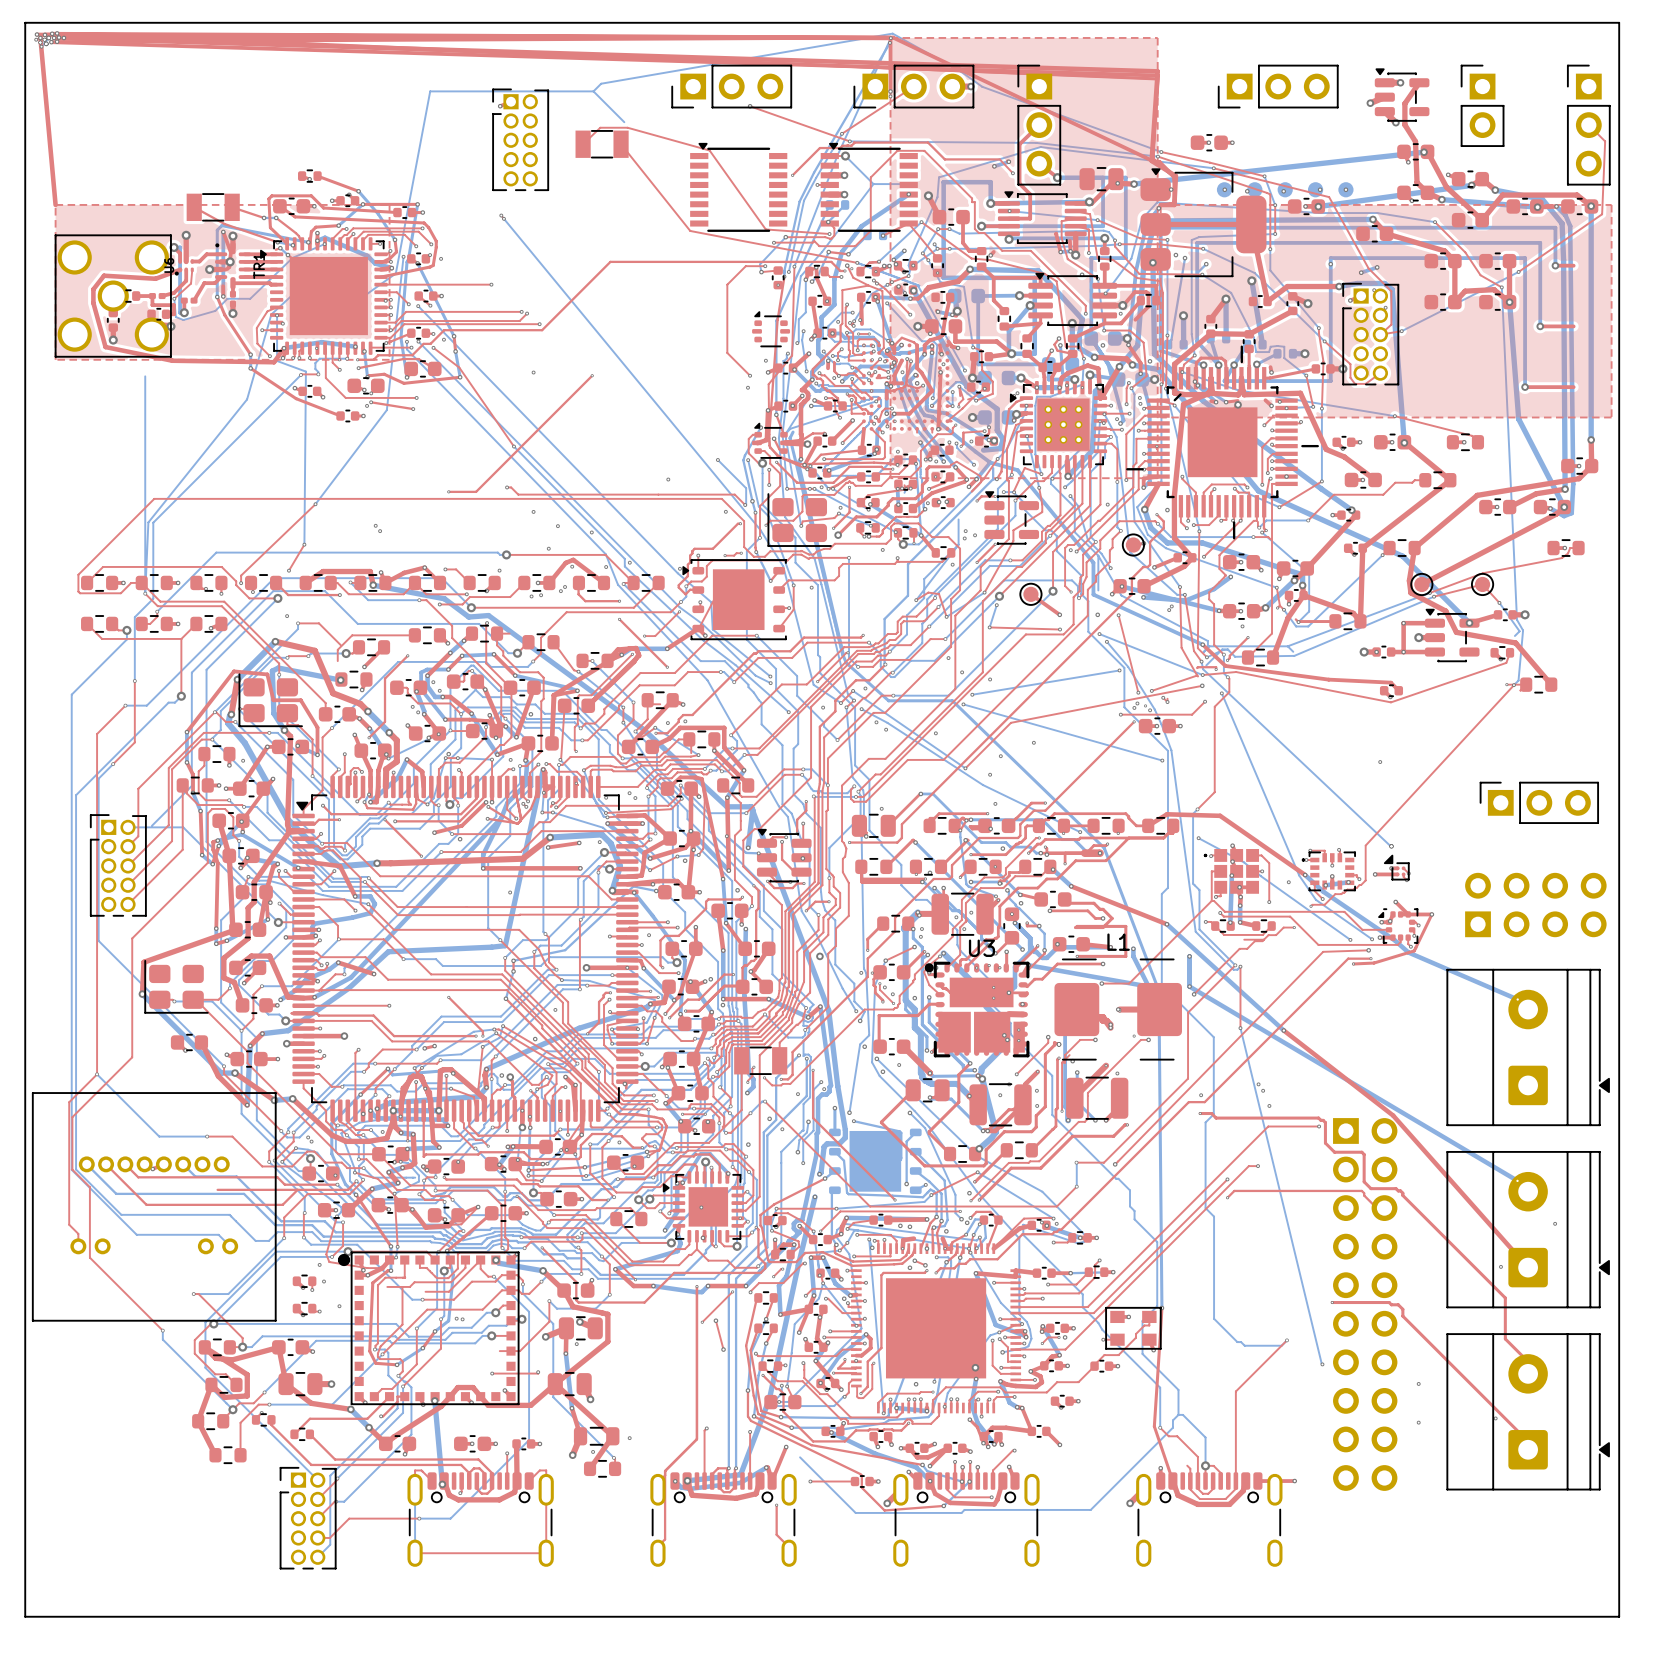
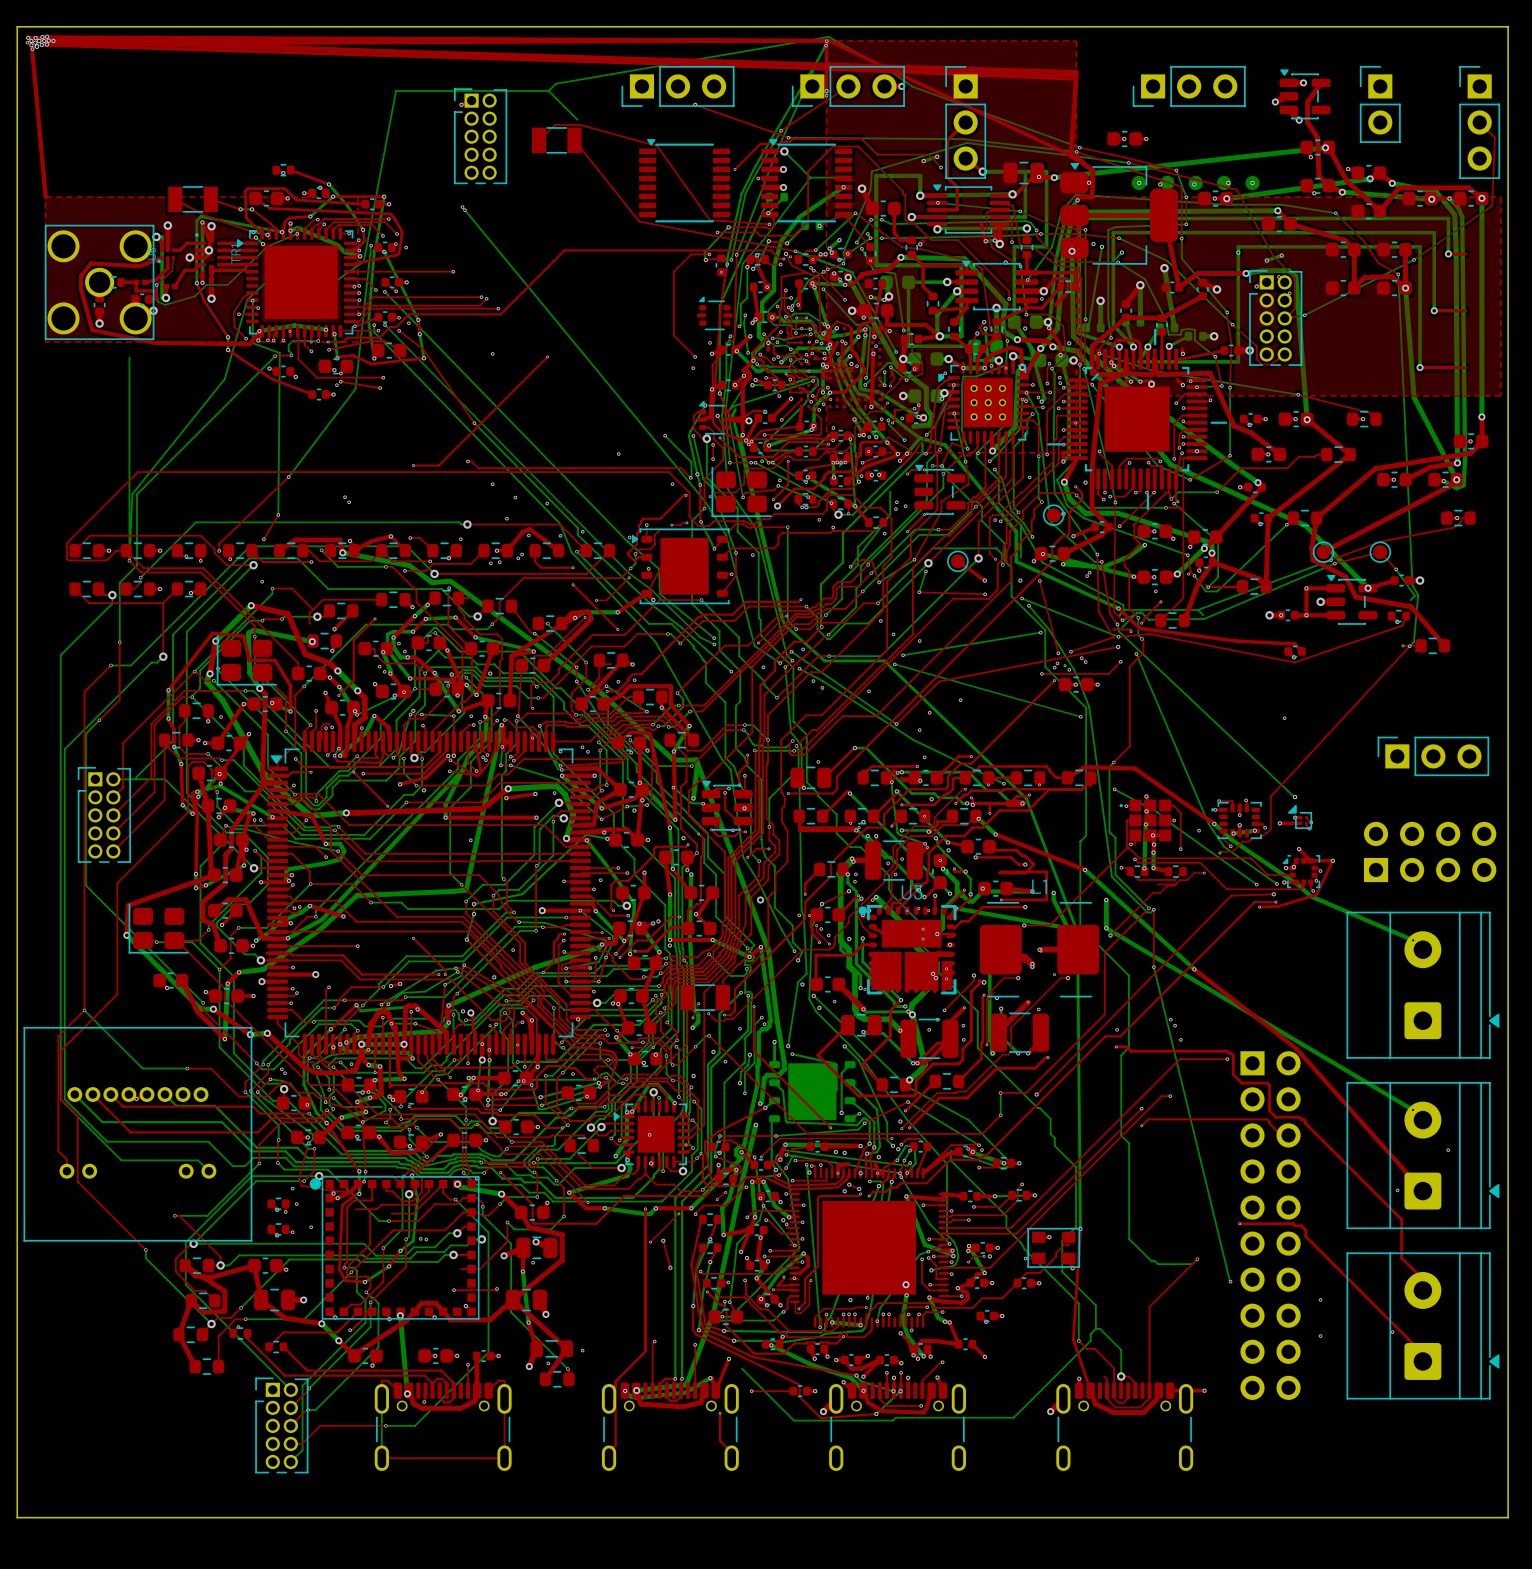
top track: (217, 1189) (297, 1189) -> none

